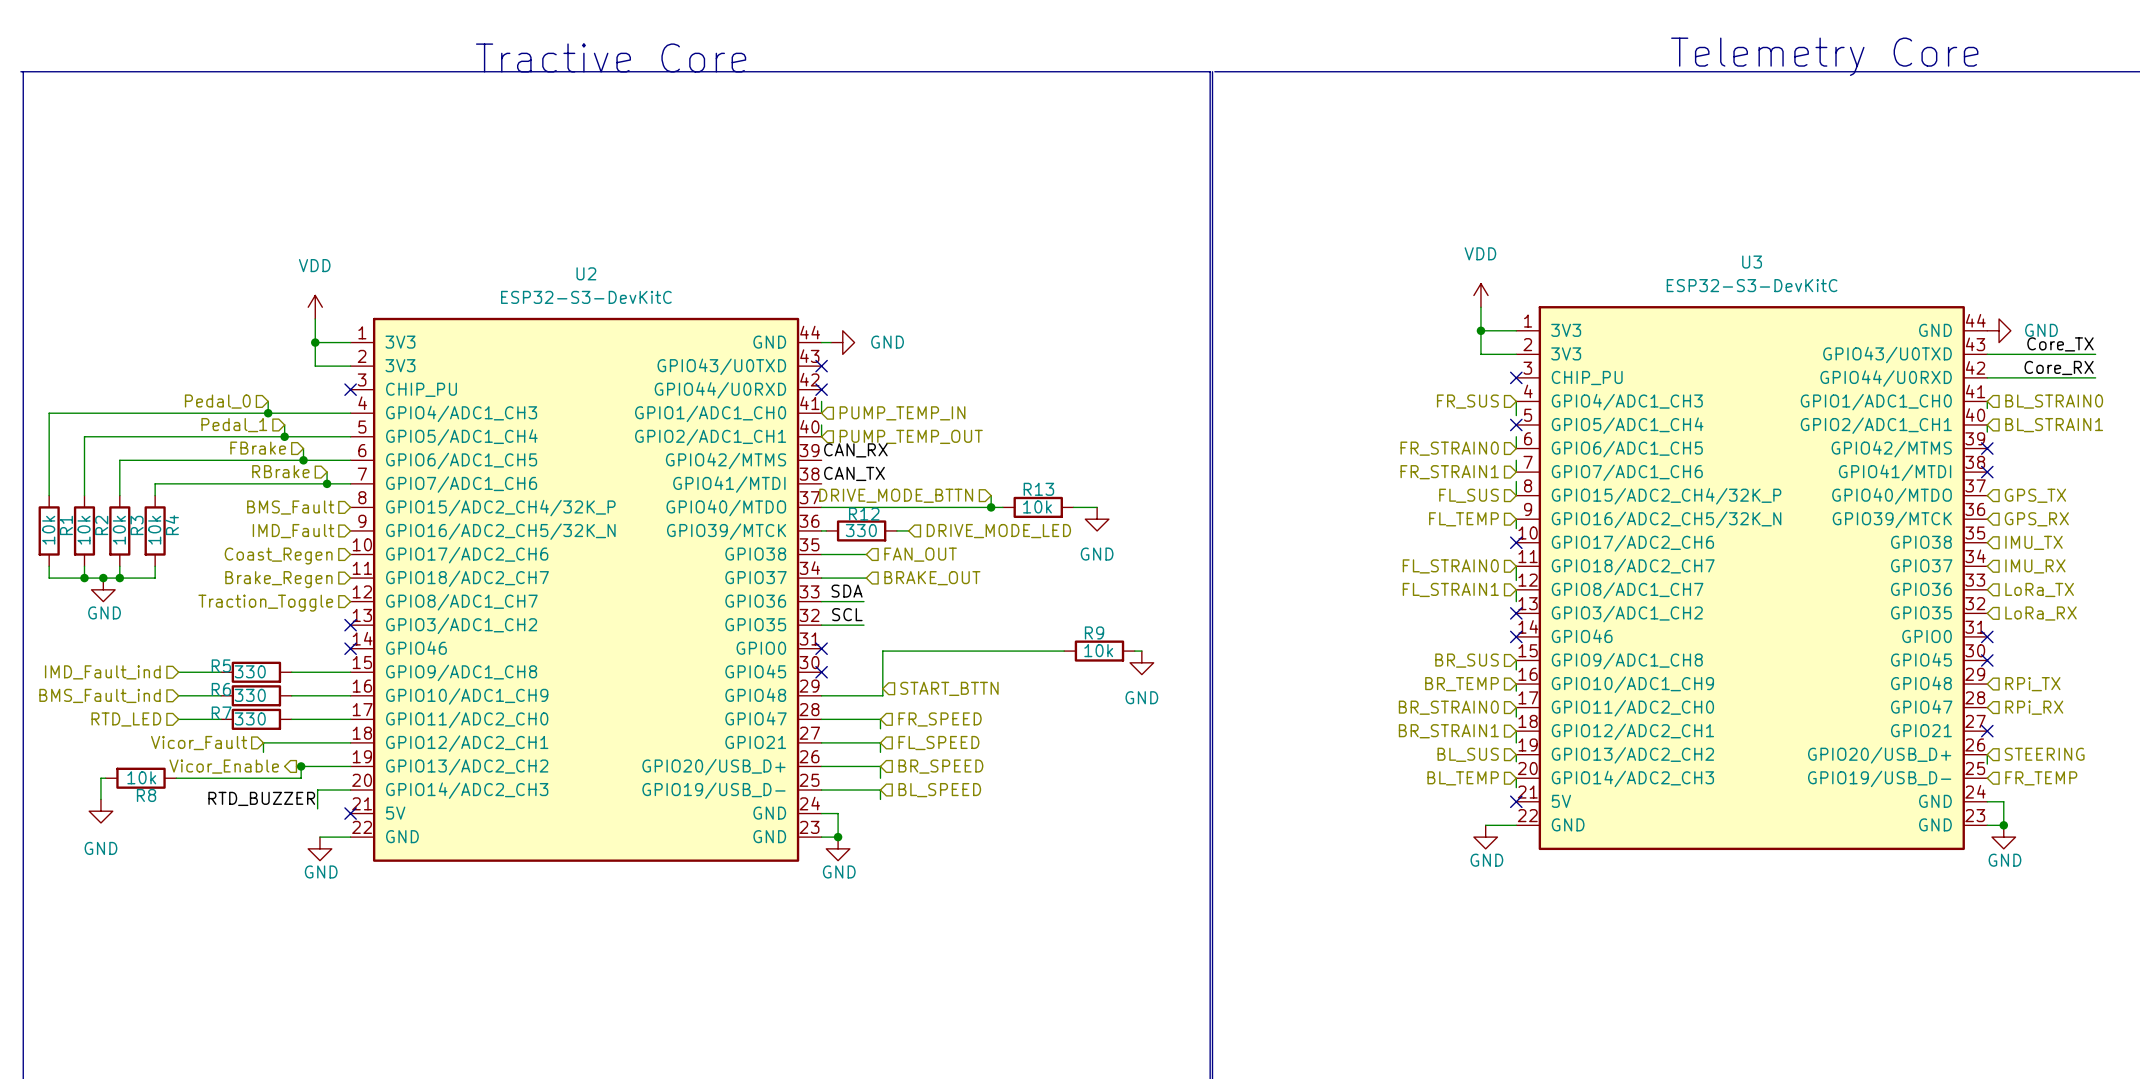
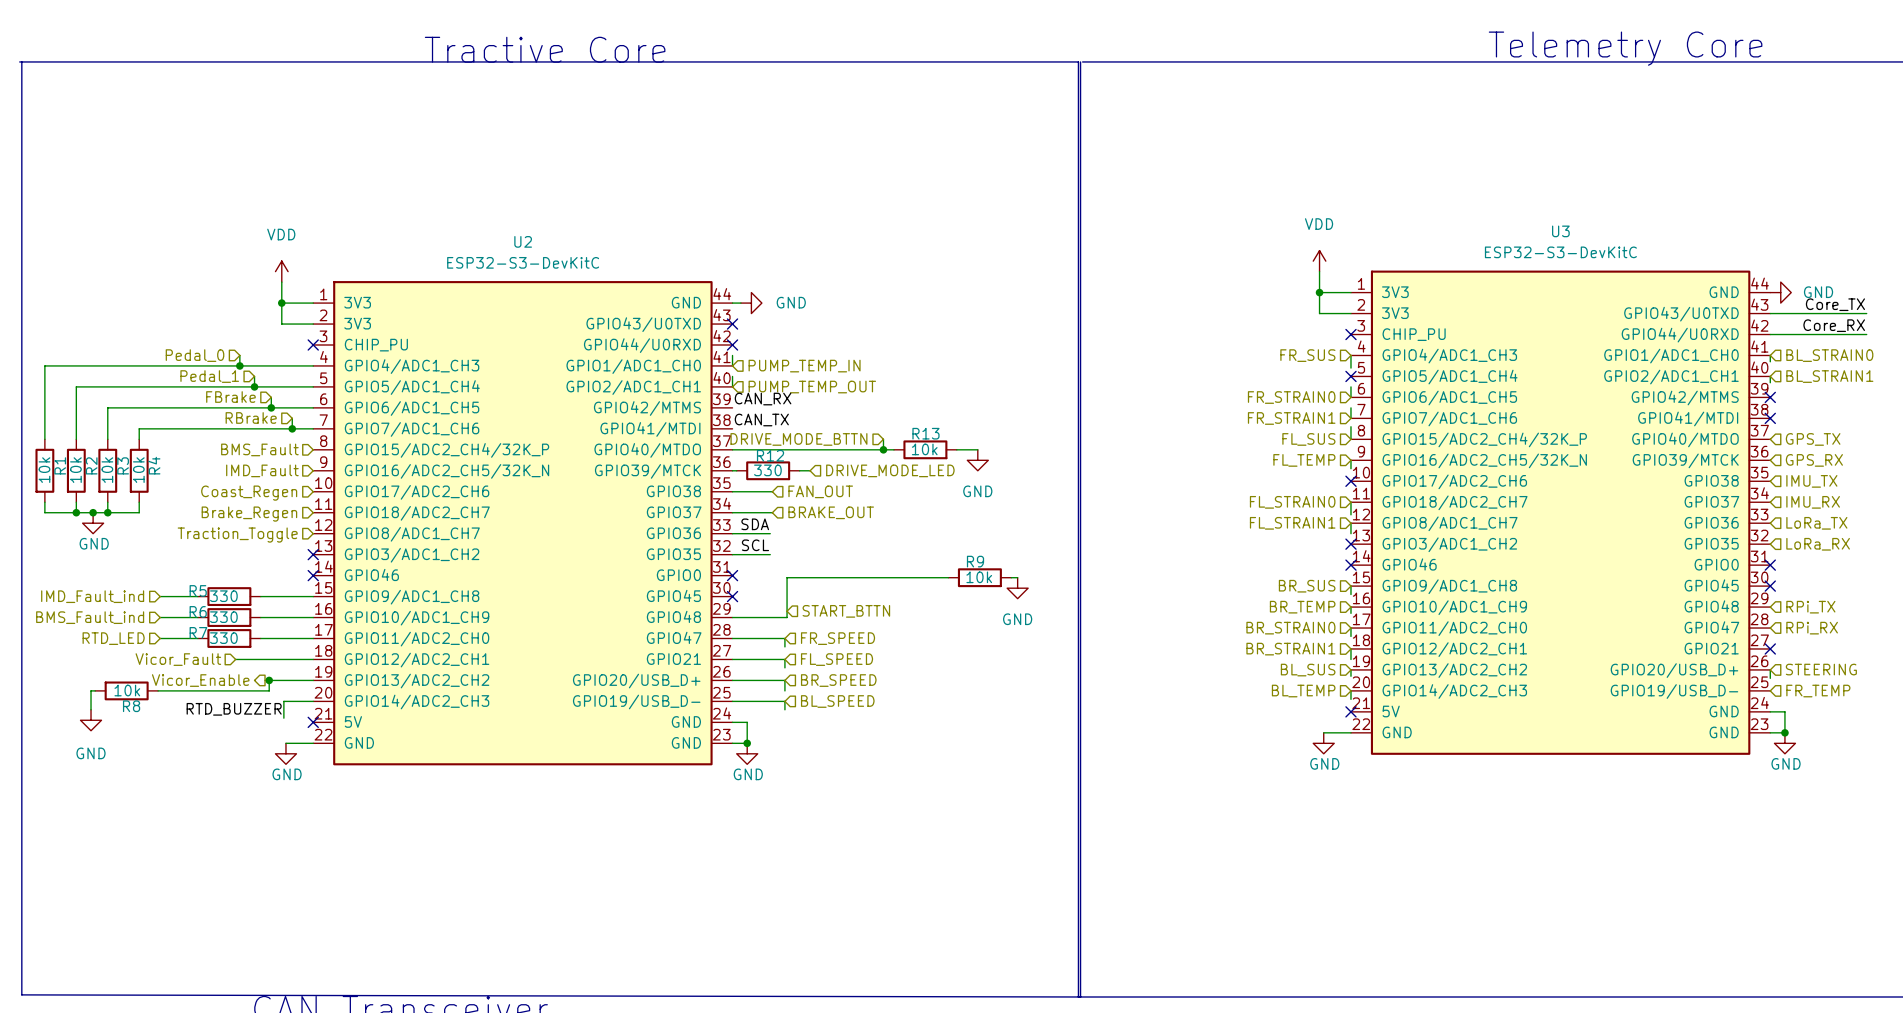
wire: (263, 742) (263, 752) -> none

